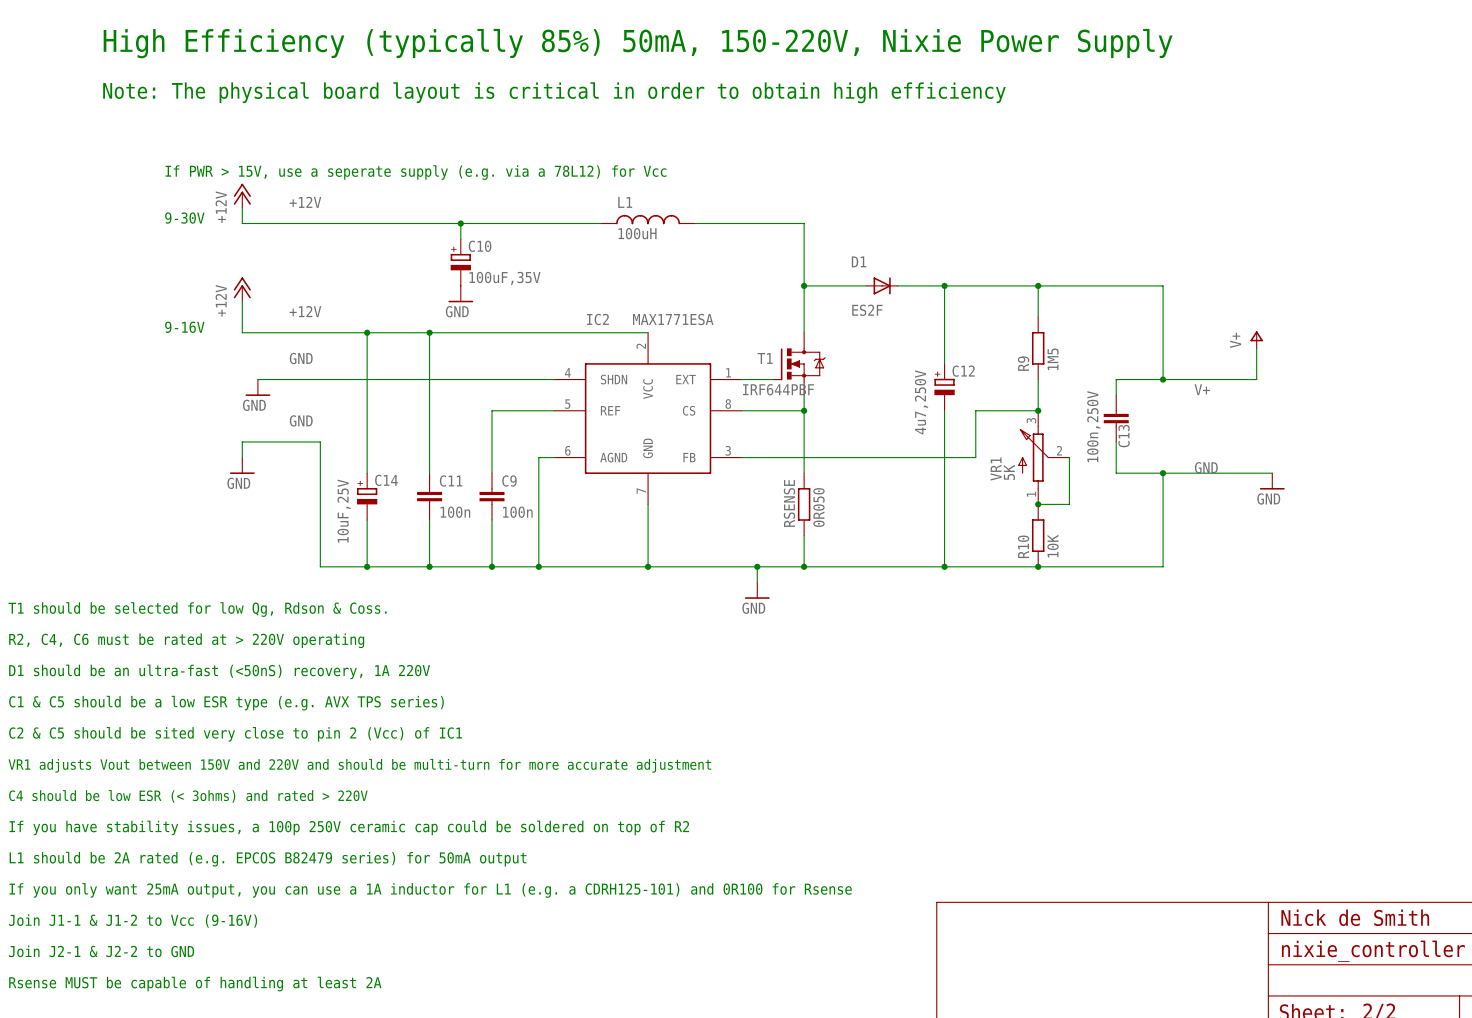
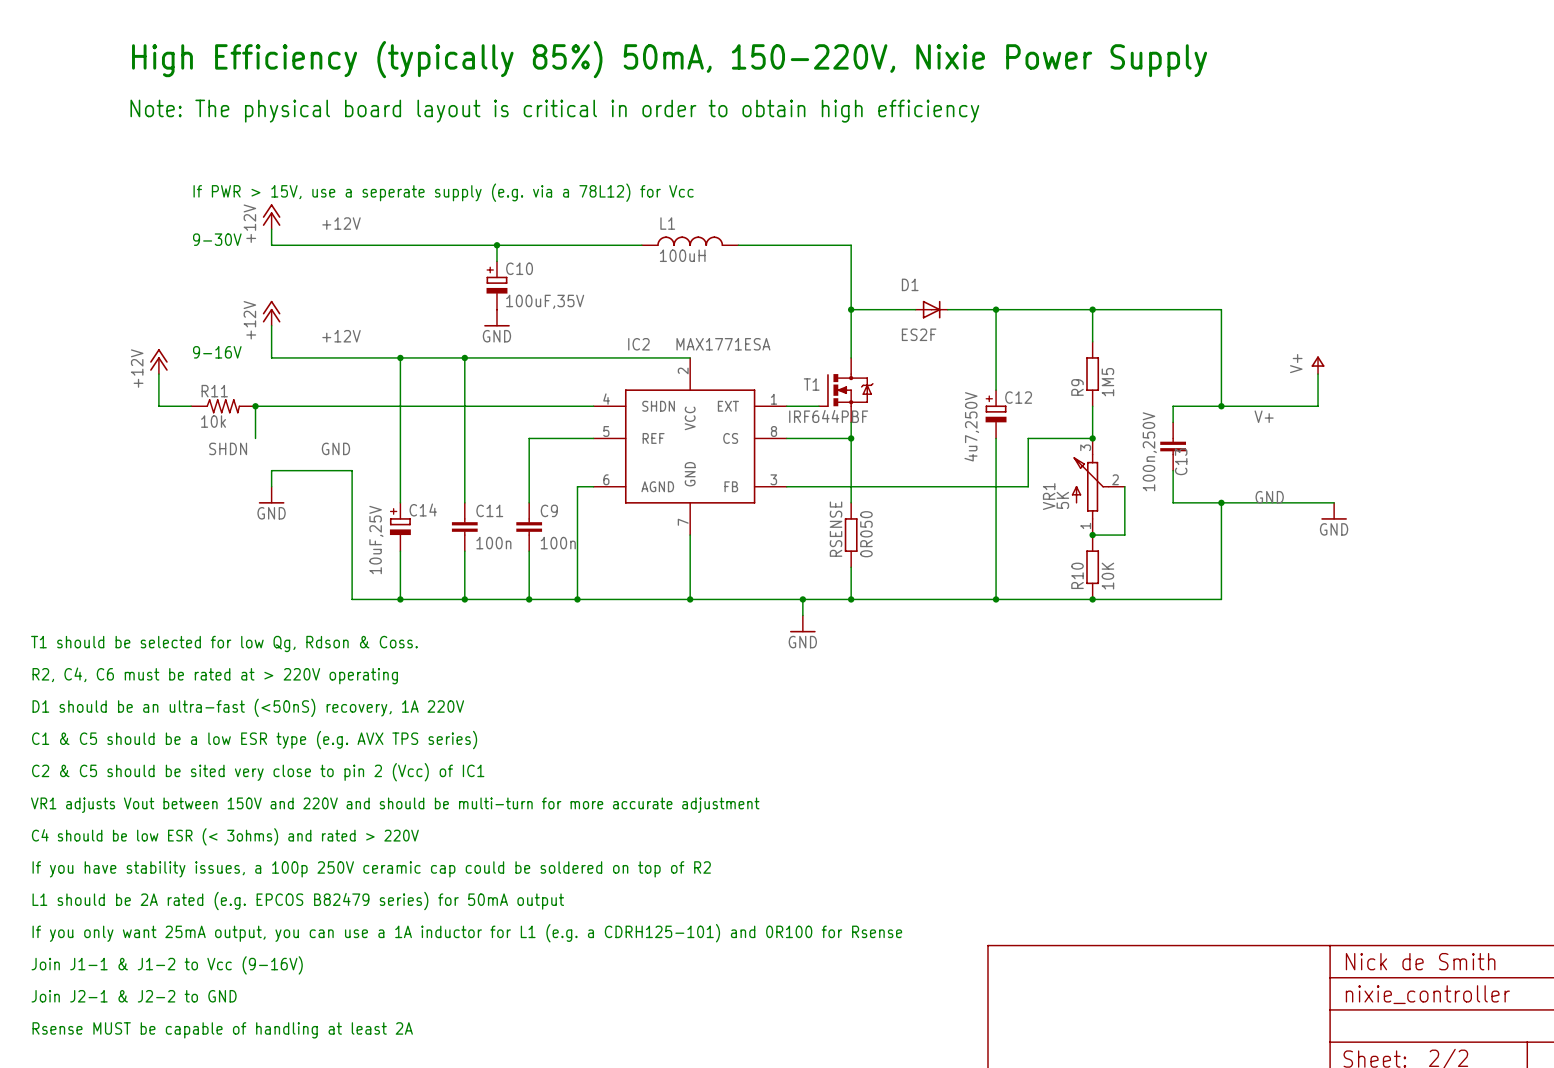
power symbol: none -> +12V (158, 361)
wire: none -> (158, 374) (158, 406) (191, 406)
label: GND (301, 358) -> none
R11: none -> 10k (223, 406)
junction: none -> (255, 406)
wire: none -> (287, 406) (255, 406) (255, 438)
power symbol: GND (257, 387) -> none
label: none -> SHDN (228, 448)

